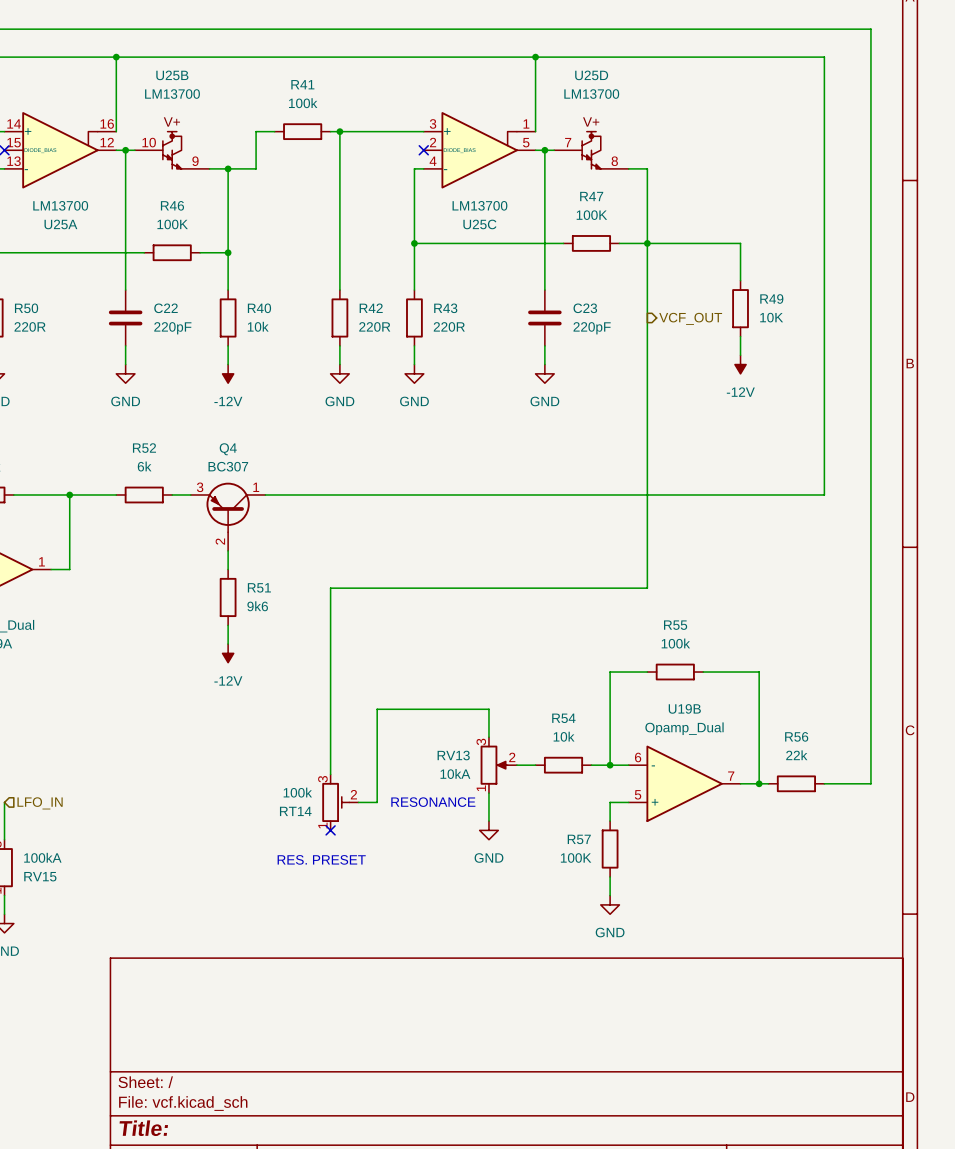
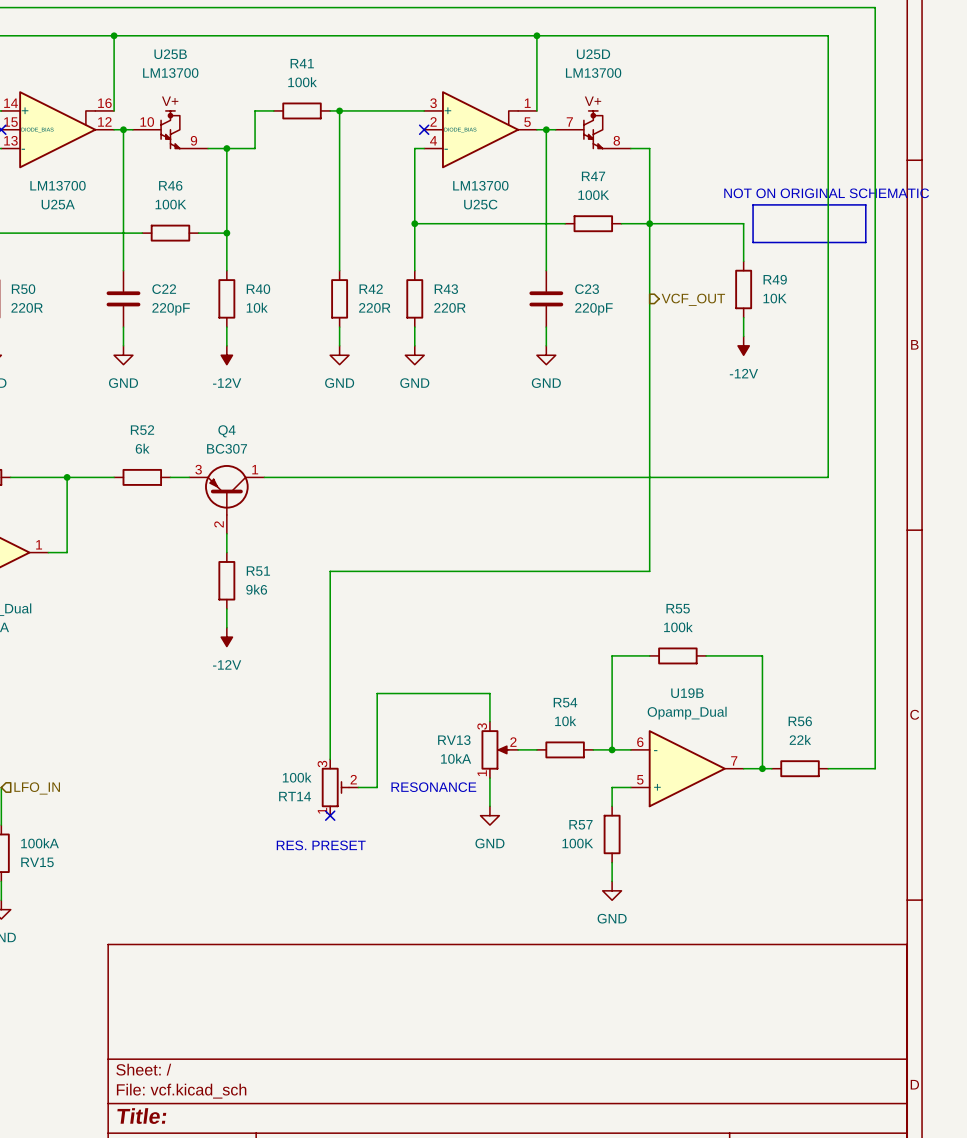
text: none -> NOT ON ORIGINAL SCHEMATIC (826, 193)
line: none -> (753, 204) (865, 204) (865, 242) (753, 242) (753, 204)

